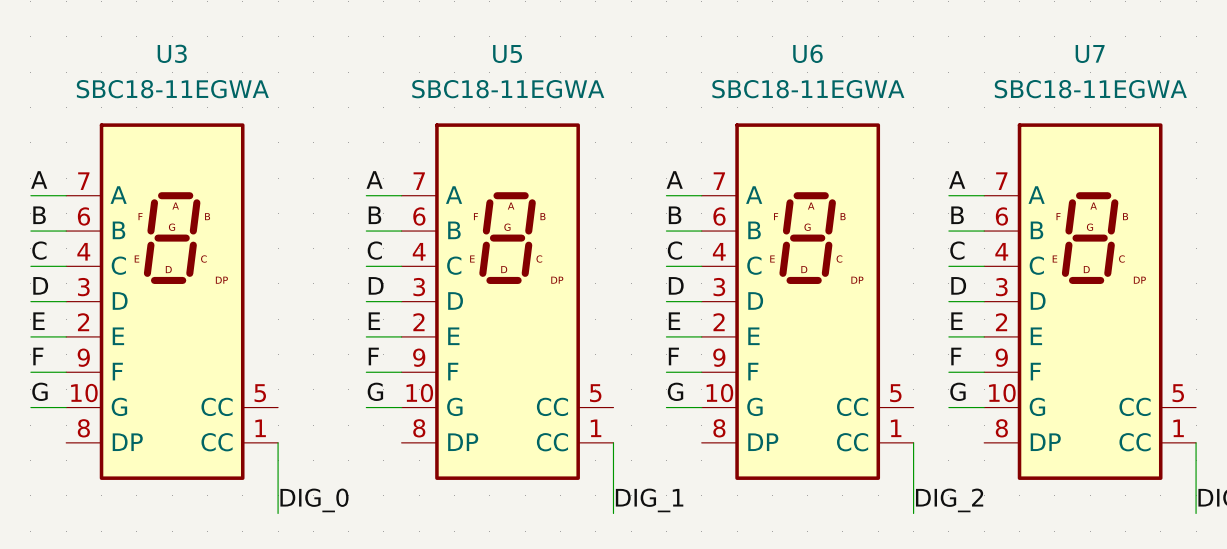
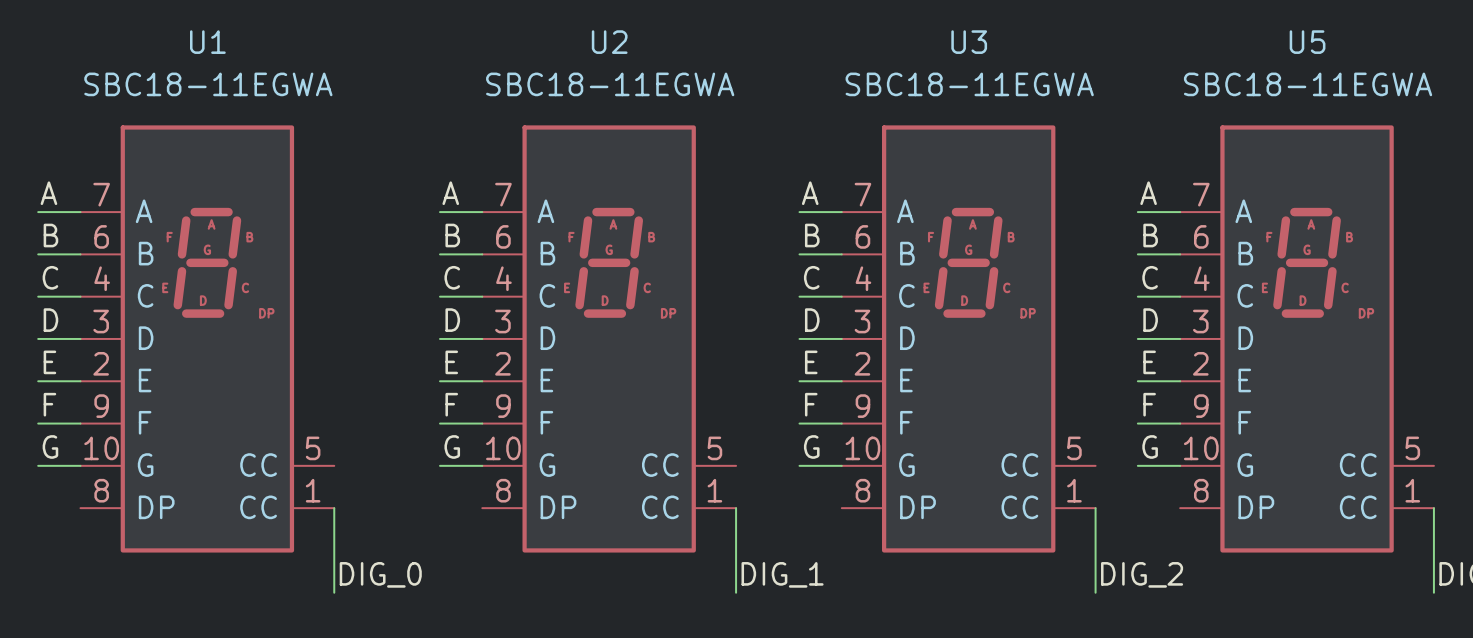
U3 name: U3 (172, 53) -> U1 (207, 42)
U6 name: U6 (807, 53) -> U3 (969, 42)
U5 name: U5 (507, 54) -> U2 (609, 42)
U7 name: U7 (1090, 54) -> U5 (1307, 42)

